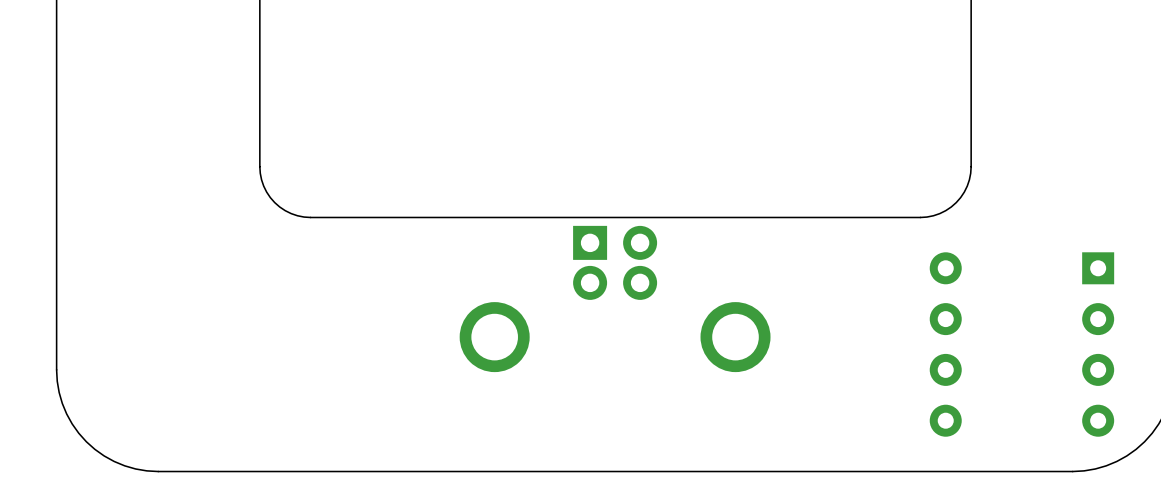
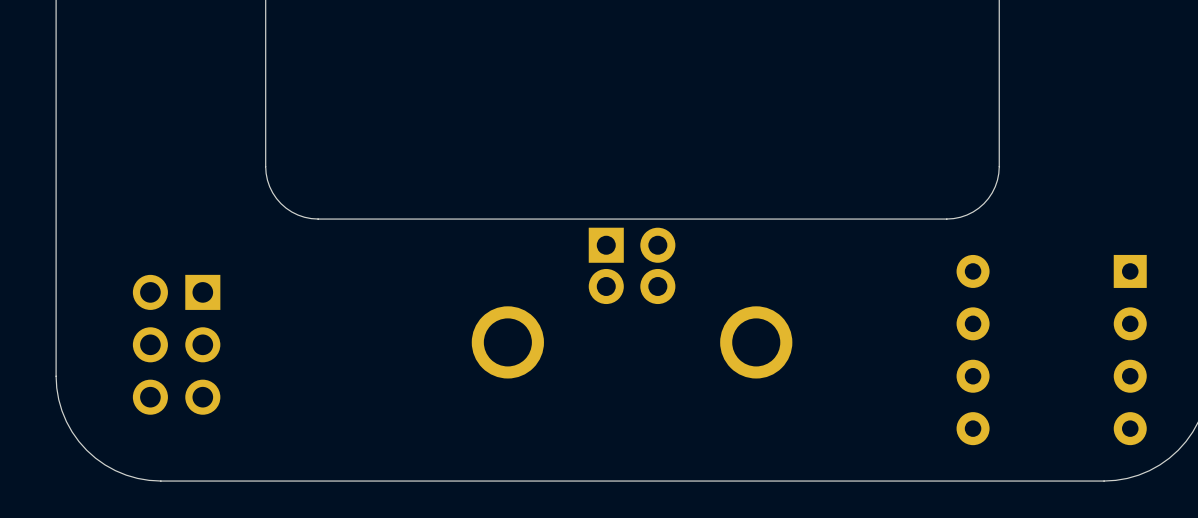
part: none -> (176, 344)

